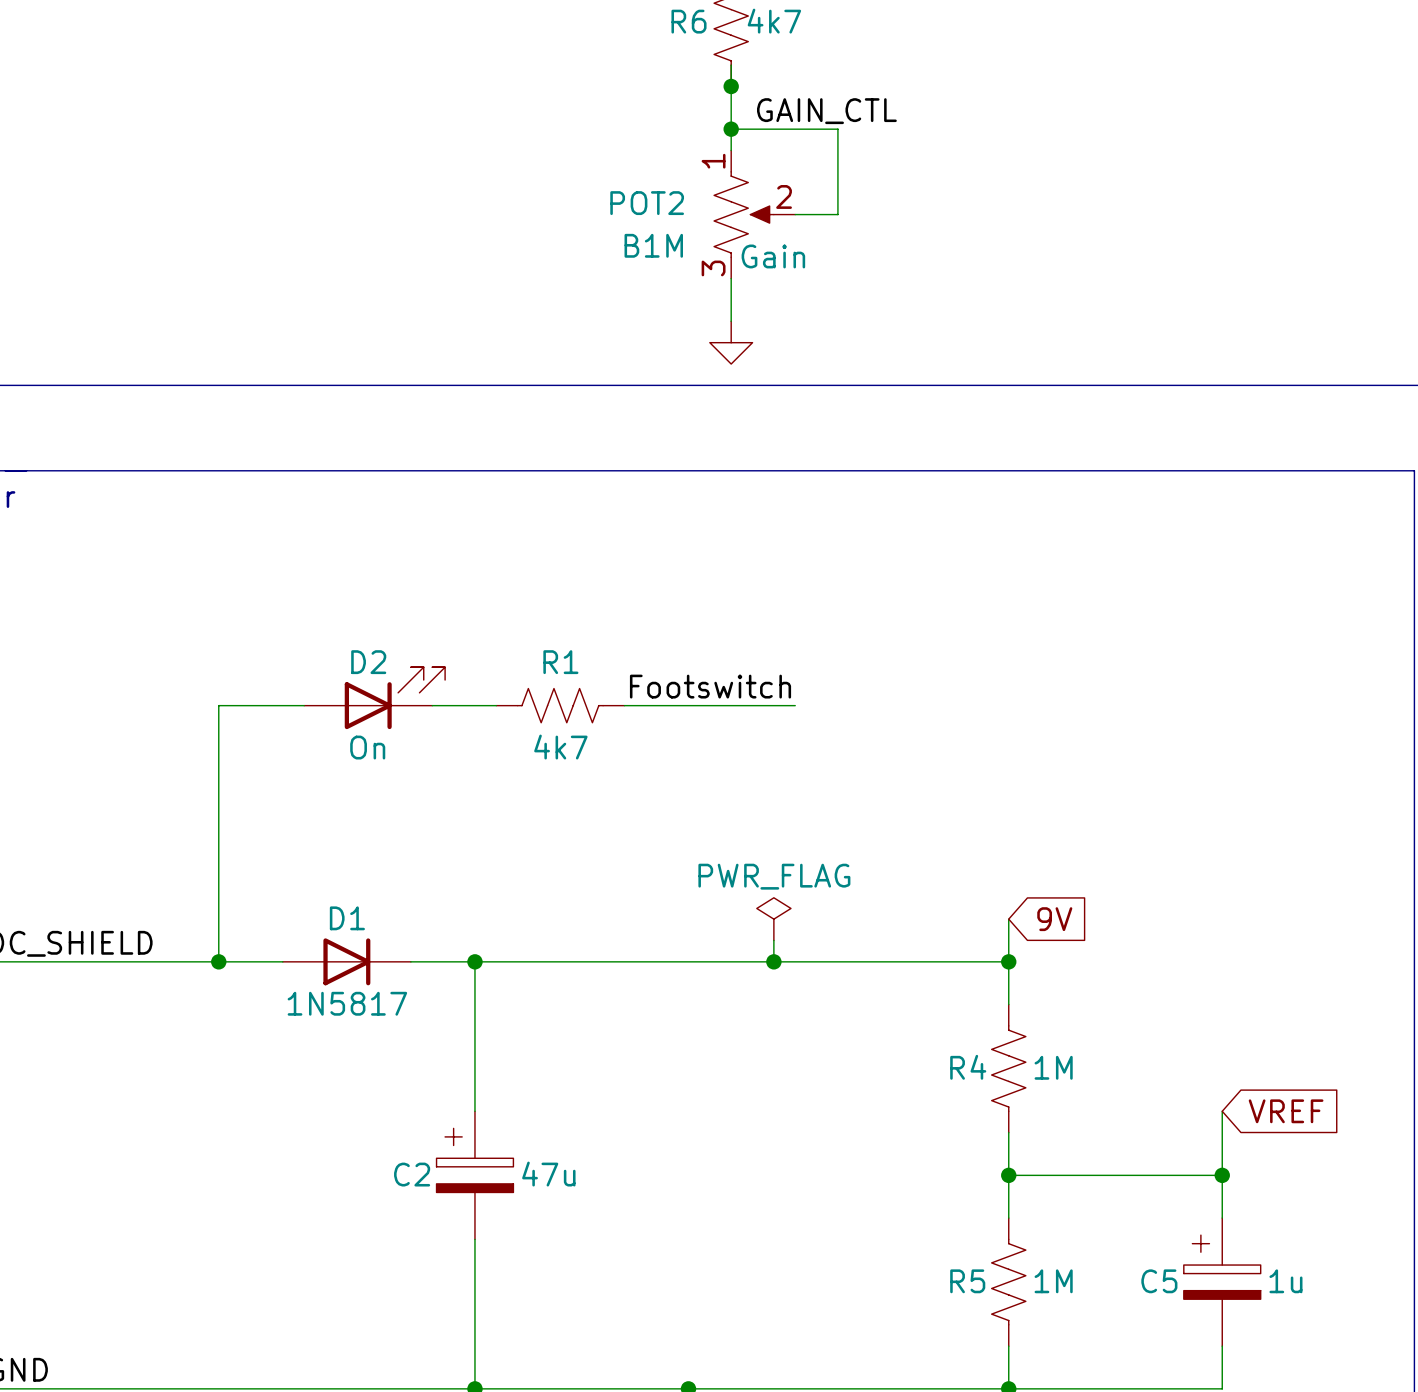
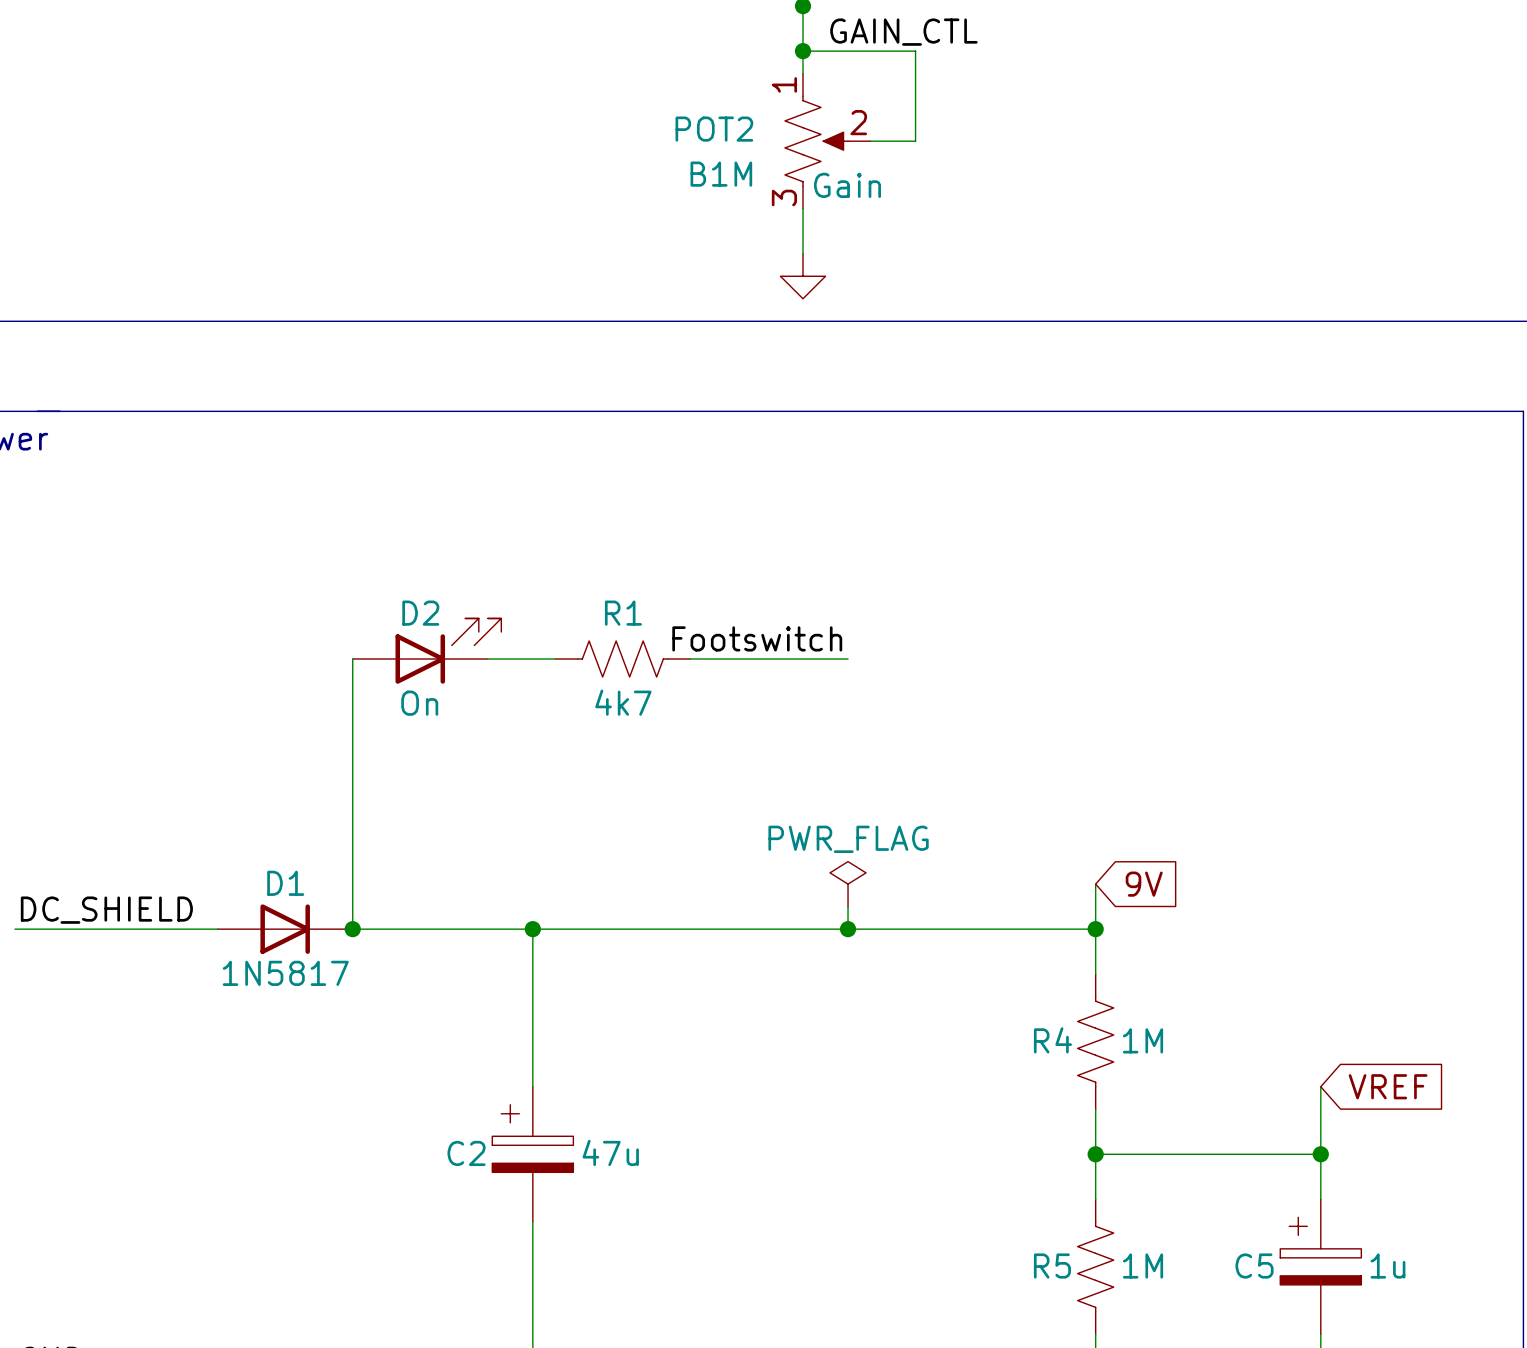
label position: Footswitch (710, 686) -> Footswitch (757, 638)
wire: (304, 705) (218, 705) (218, 961) -> (352, 659) (352, 929) (465, 929)
wire: (773, 705) (795, 705) -> none
junction position: (218, 961) -> (352, 929)
D1 position: (346, 961) -> (285, 929)

